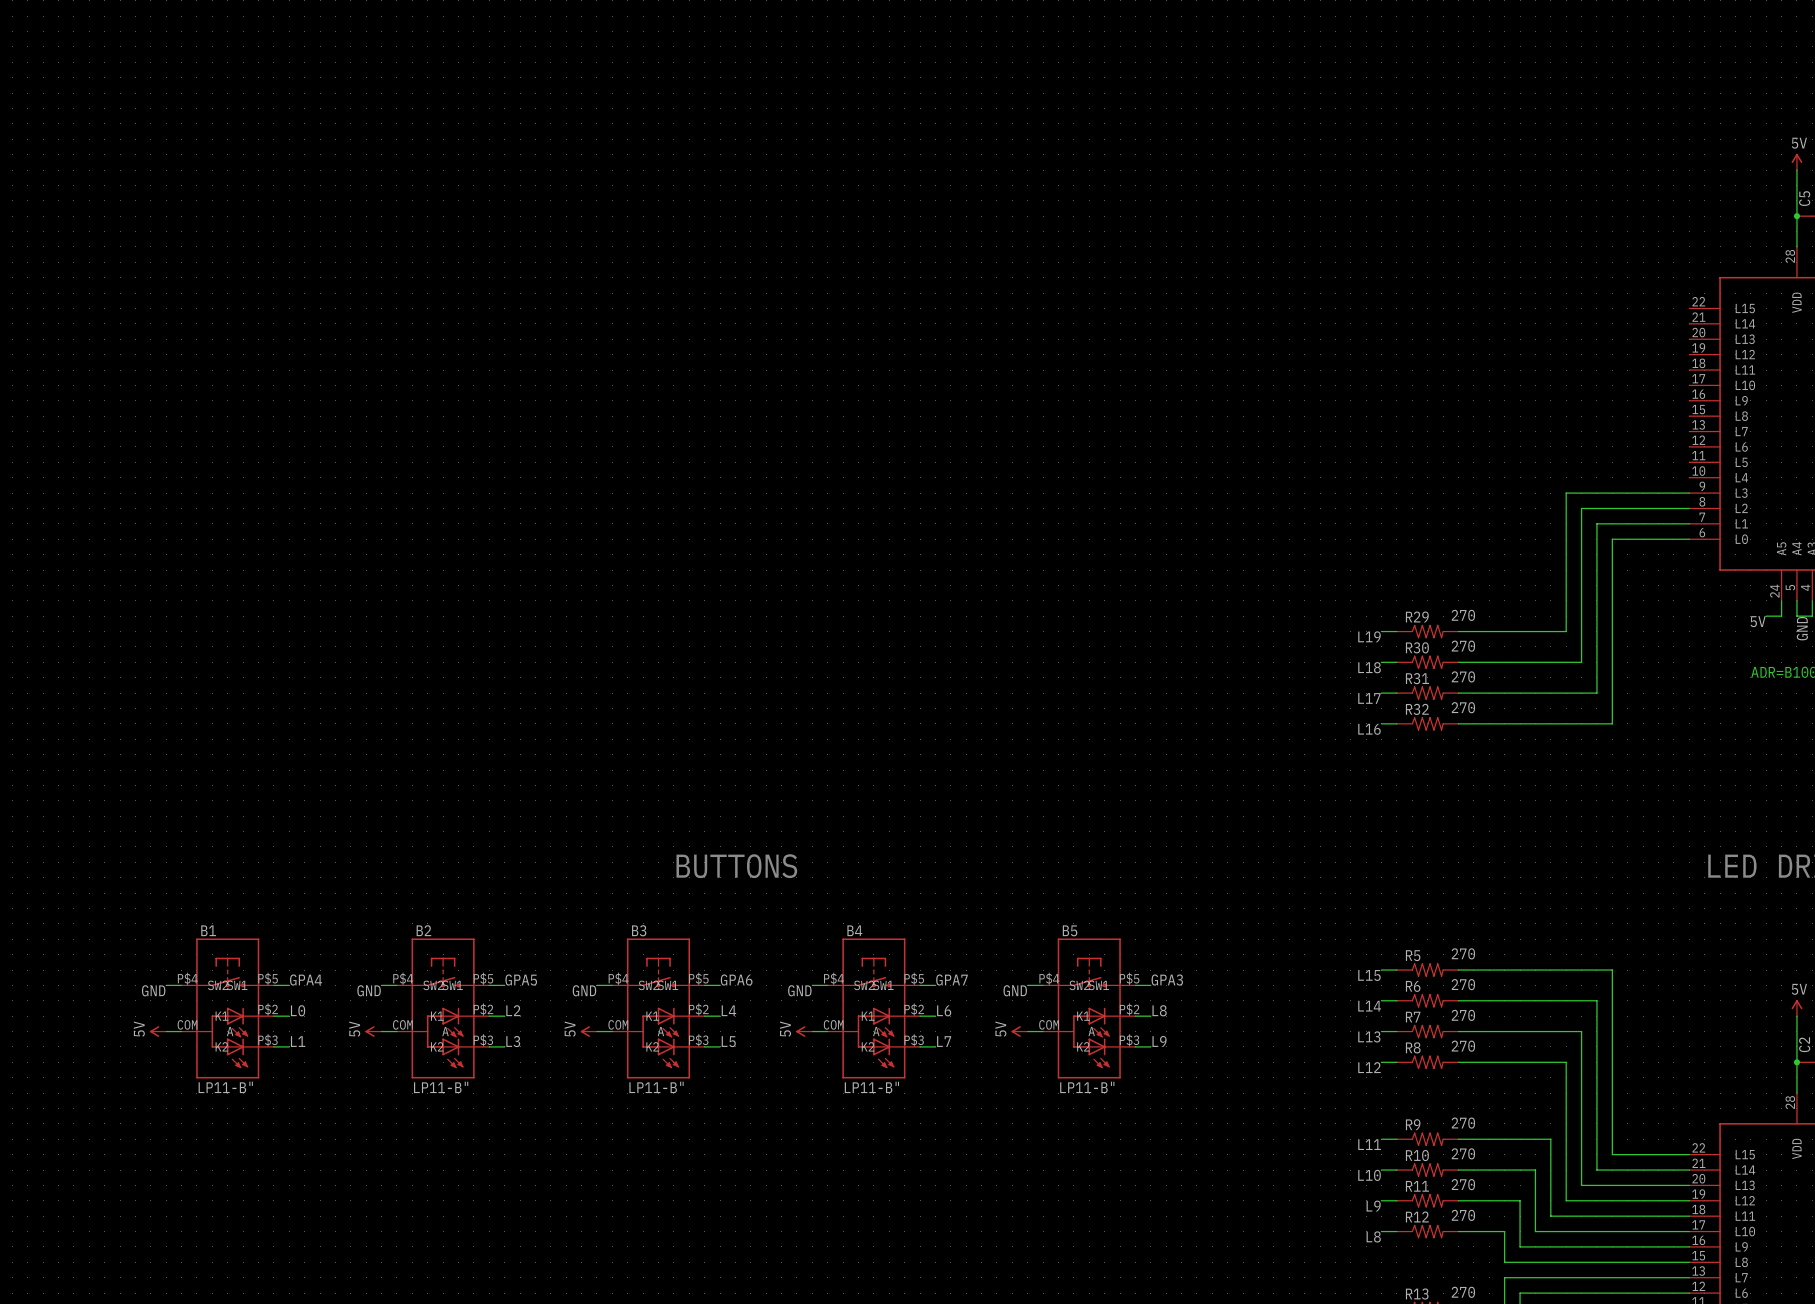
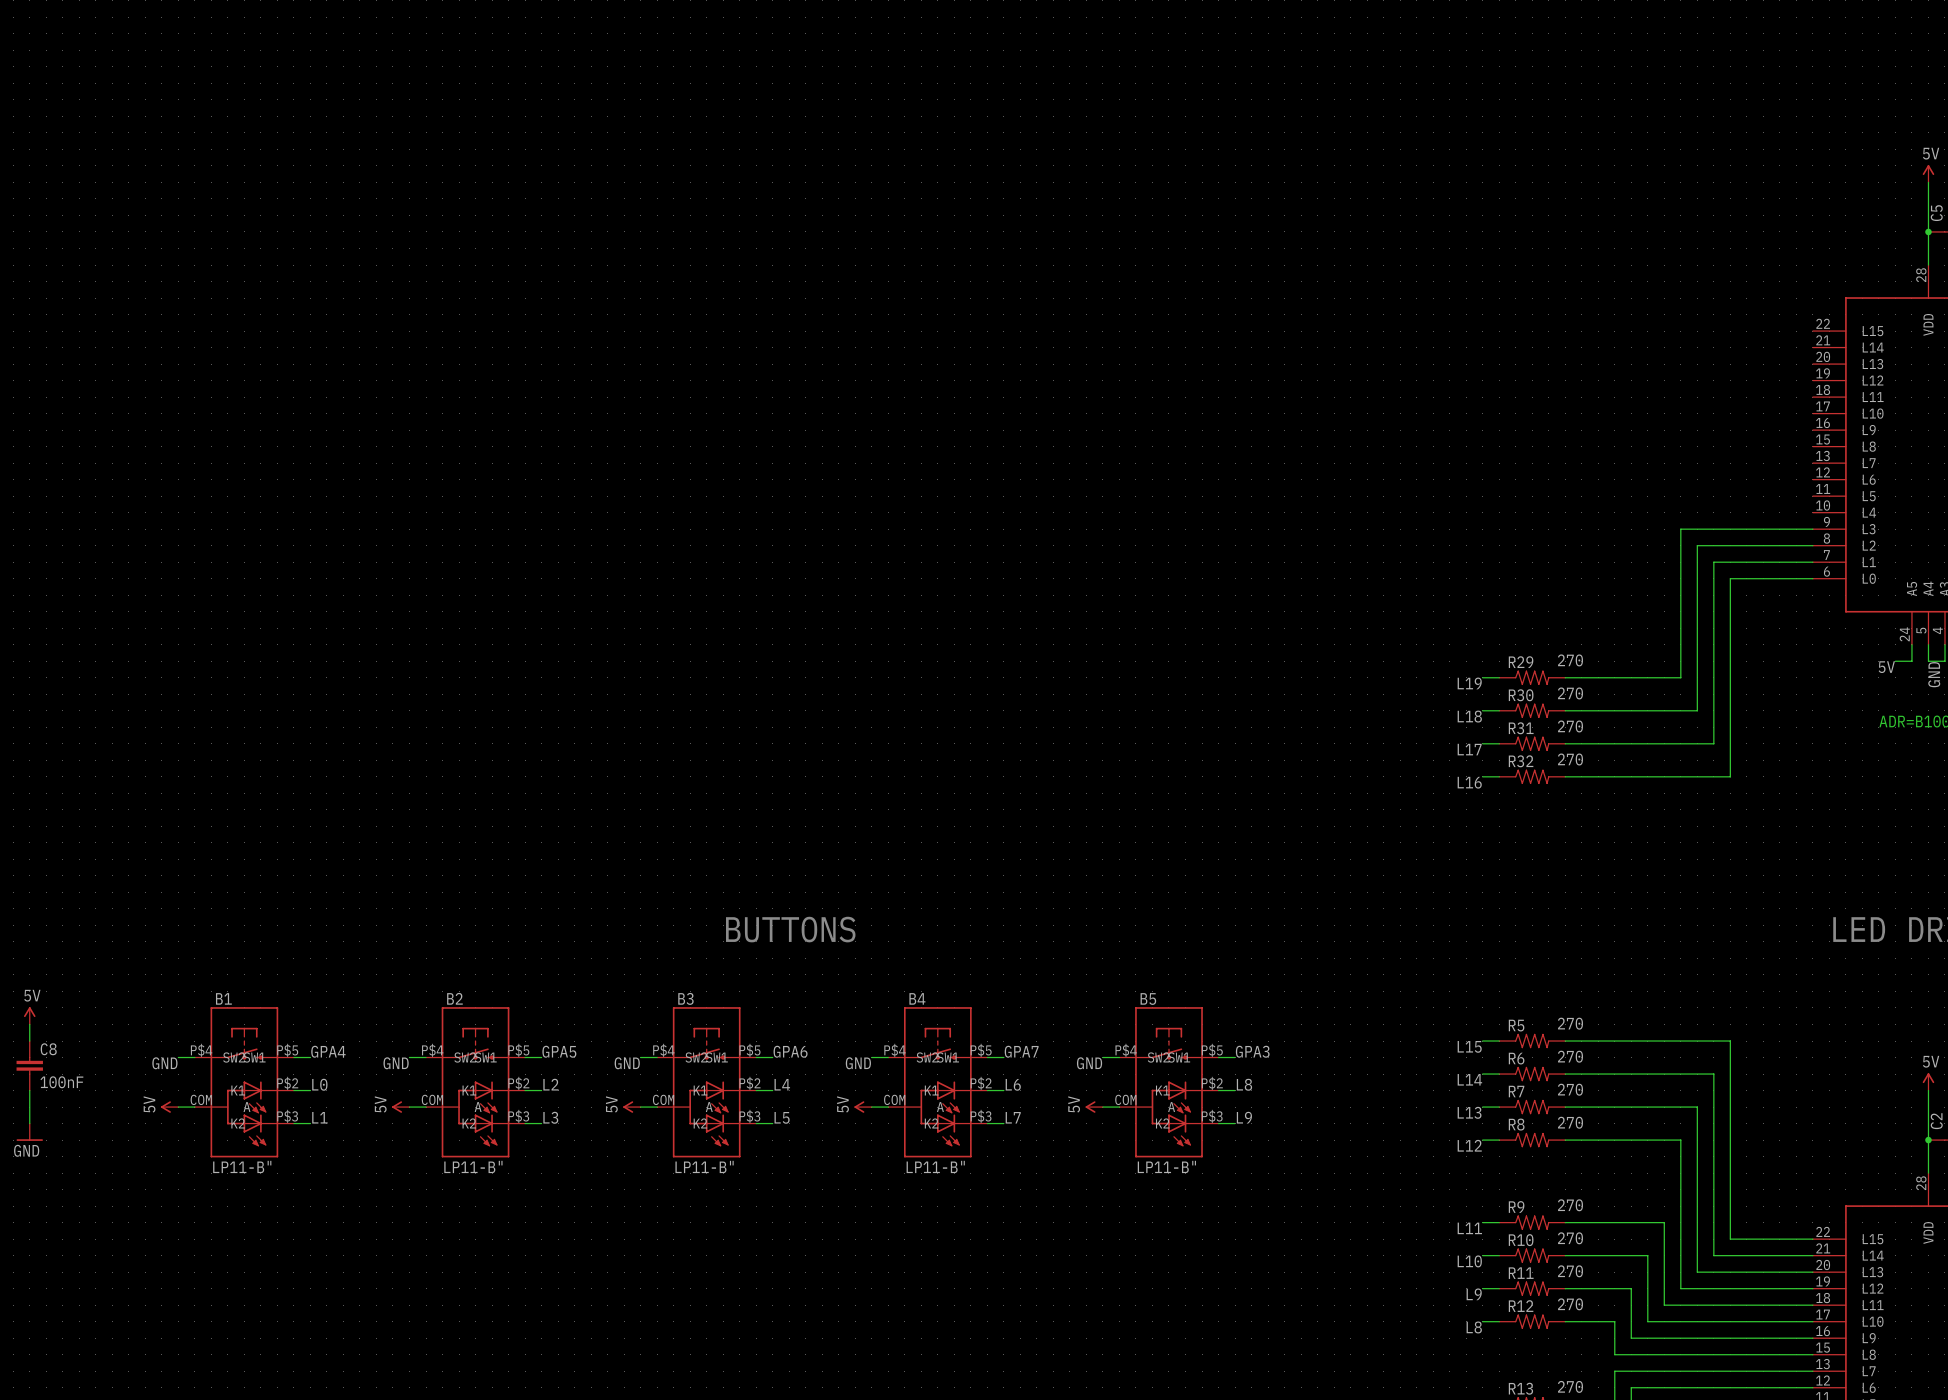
power symbol: none -> 5V (29, 1015)
wire: none -> (29, 1024) (29, 1041)
C8: none -> 100nF (29, 1065)
wire: none -> (29, 1090) (29, 1123)
power symbol: none -> GND (29, 1132)

